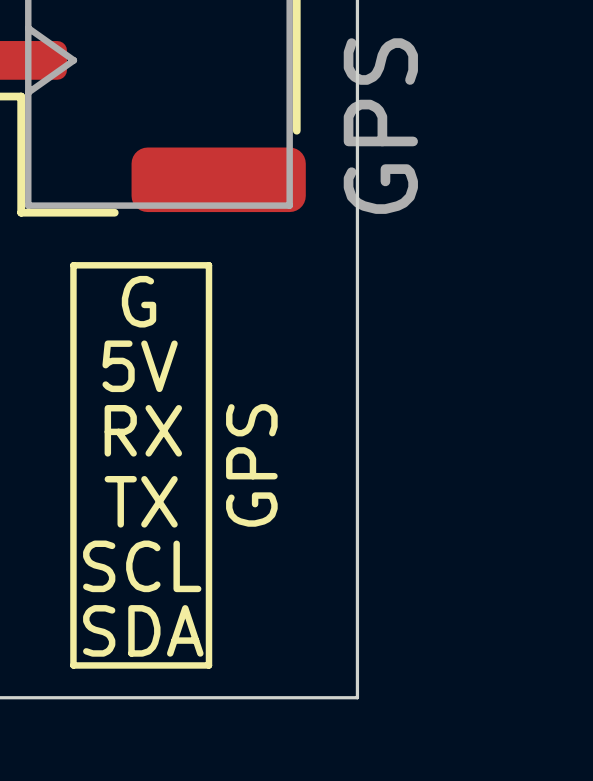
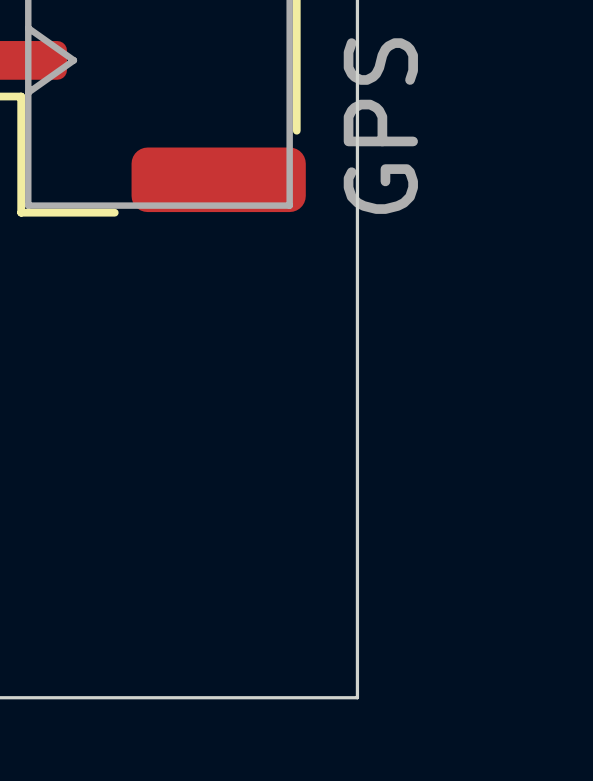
line: (73, 265) (73, 665) (208, 665) (208, 265) (73, 265) -> none
text: G (139, 301) -> none
text: 5V (140, 366) -> none
text: RX (143, 430) -> none
text: GPS (251, 465) -> none
text: TX (141, 501) -> none
text: SCL (142, 566) -> none
text: SDA (143, 630) -> none

